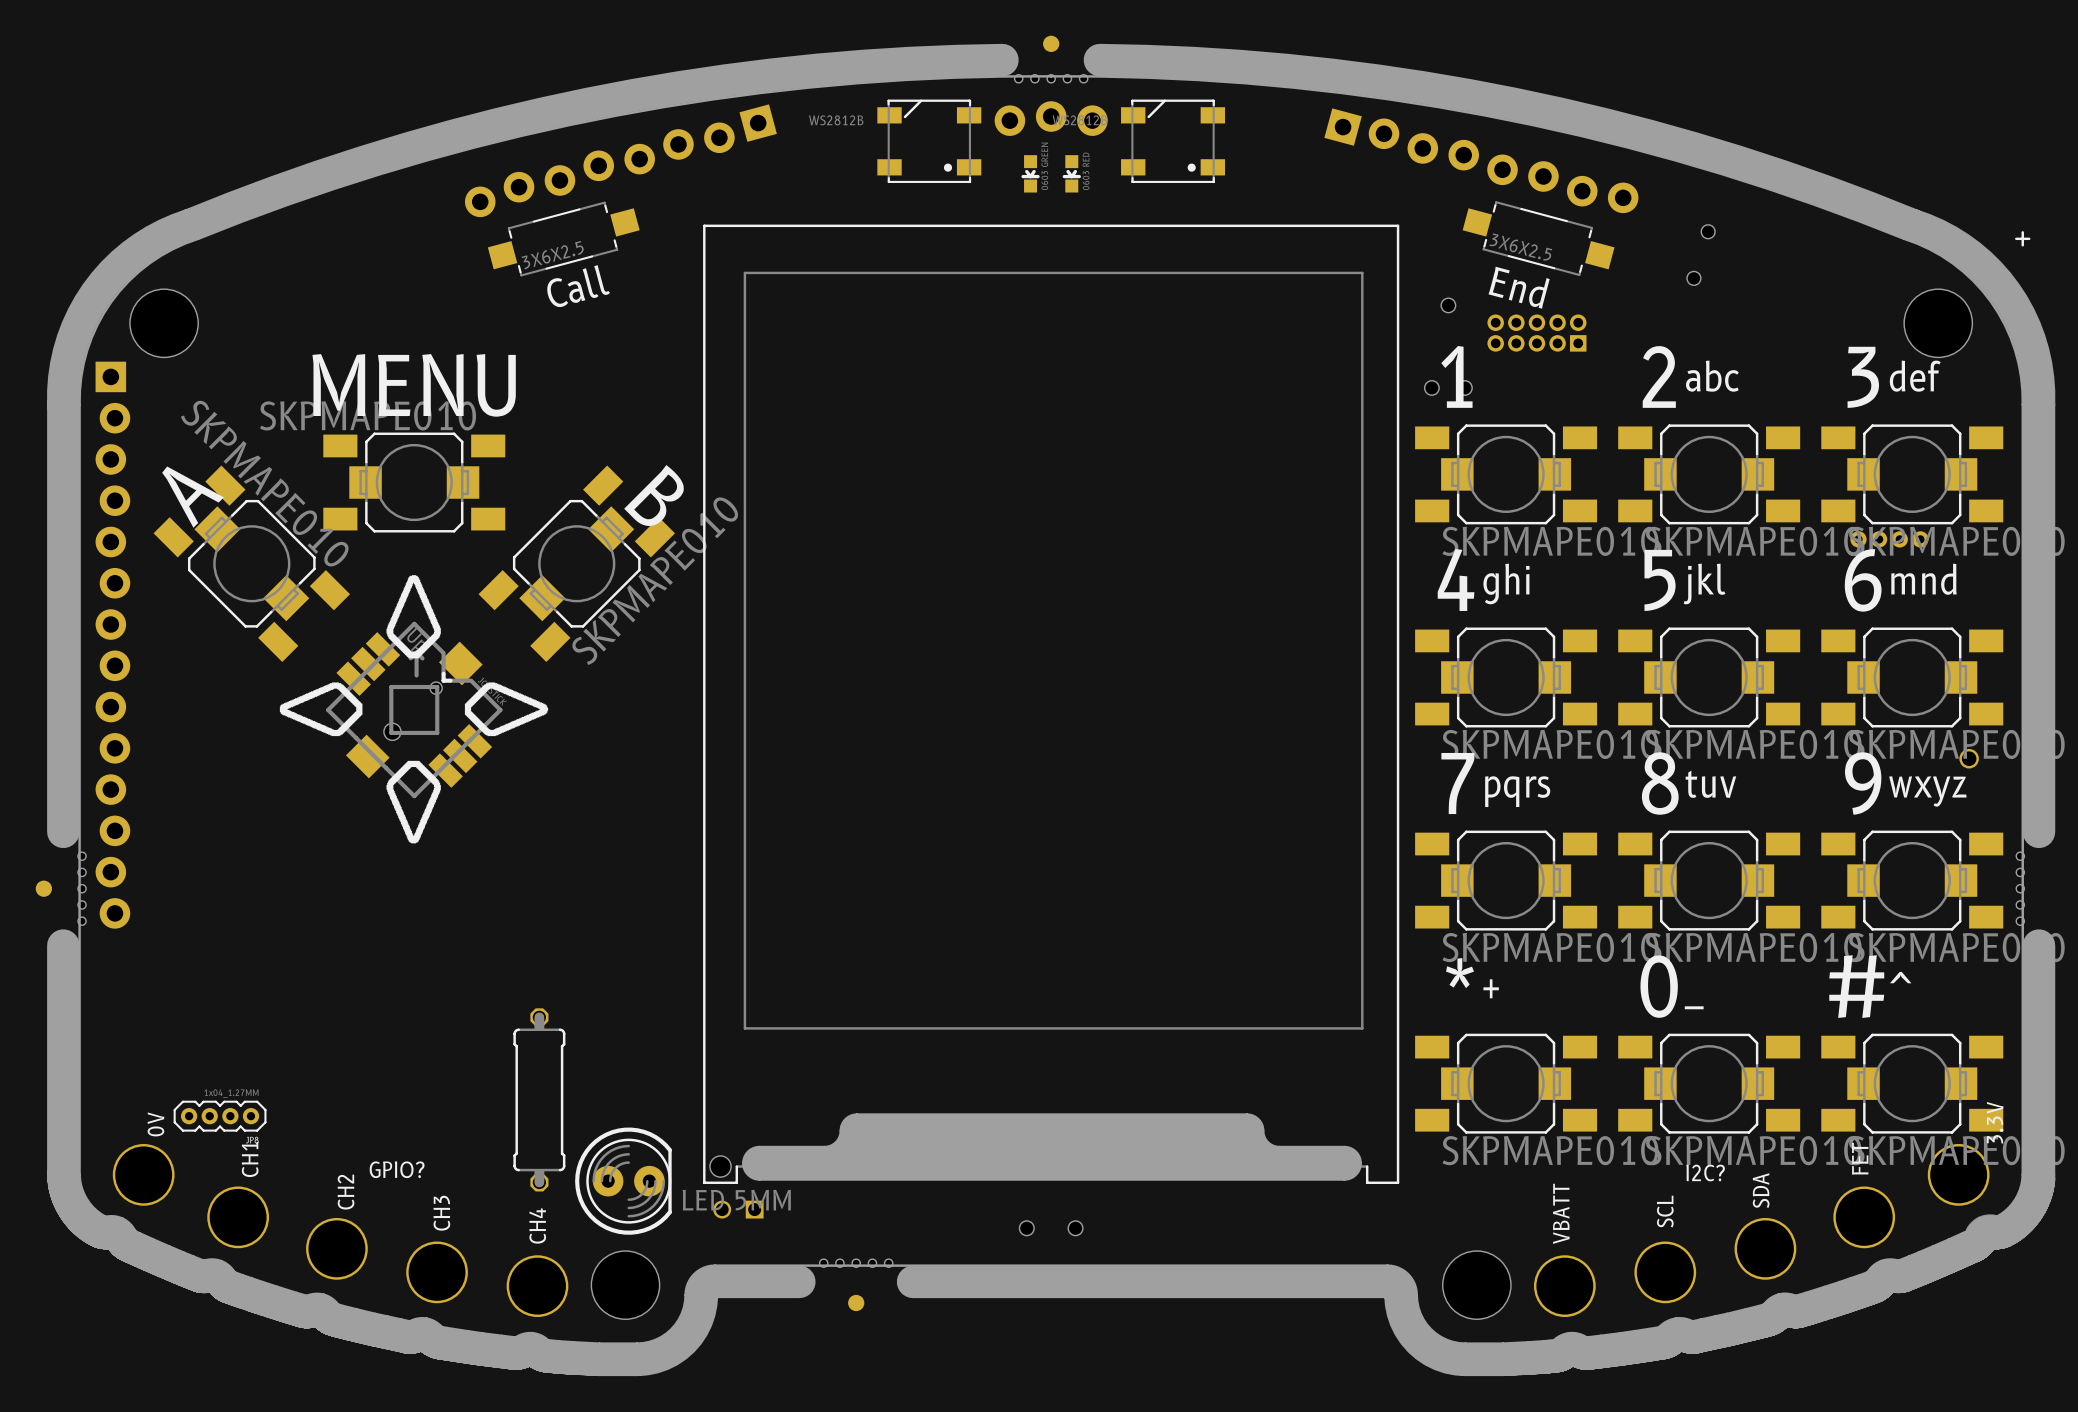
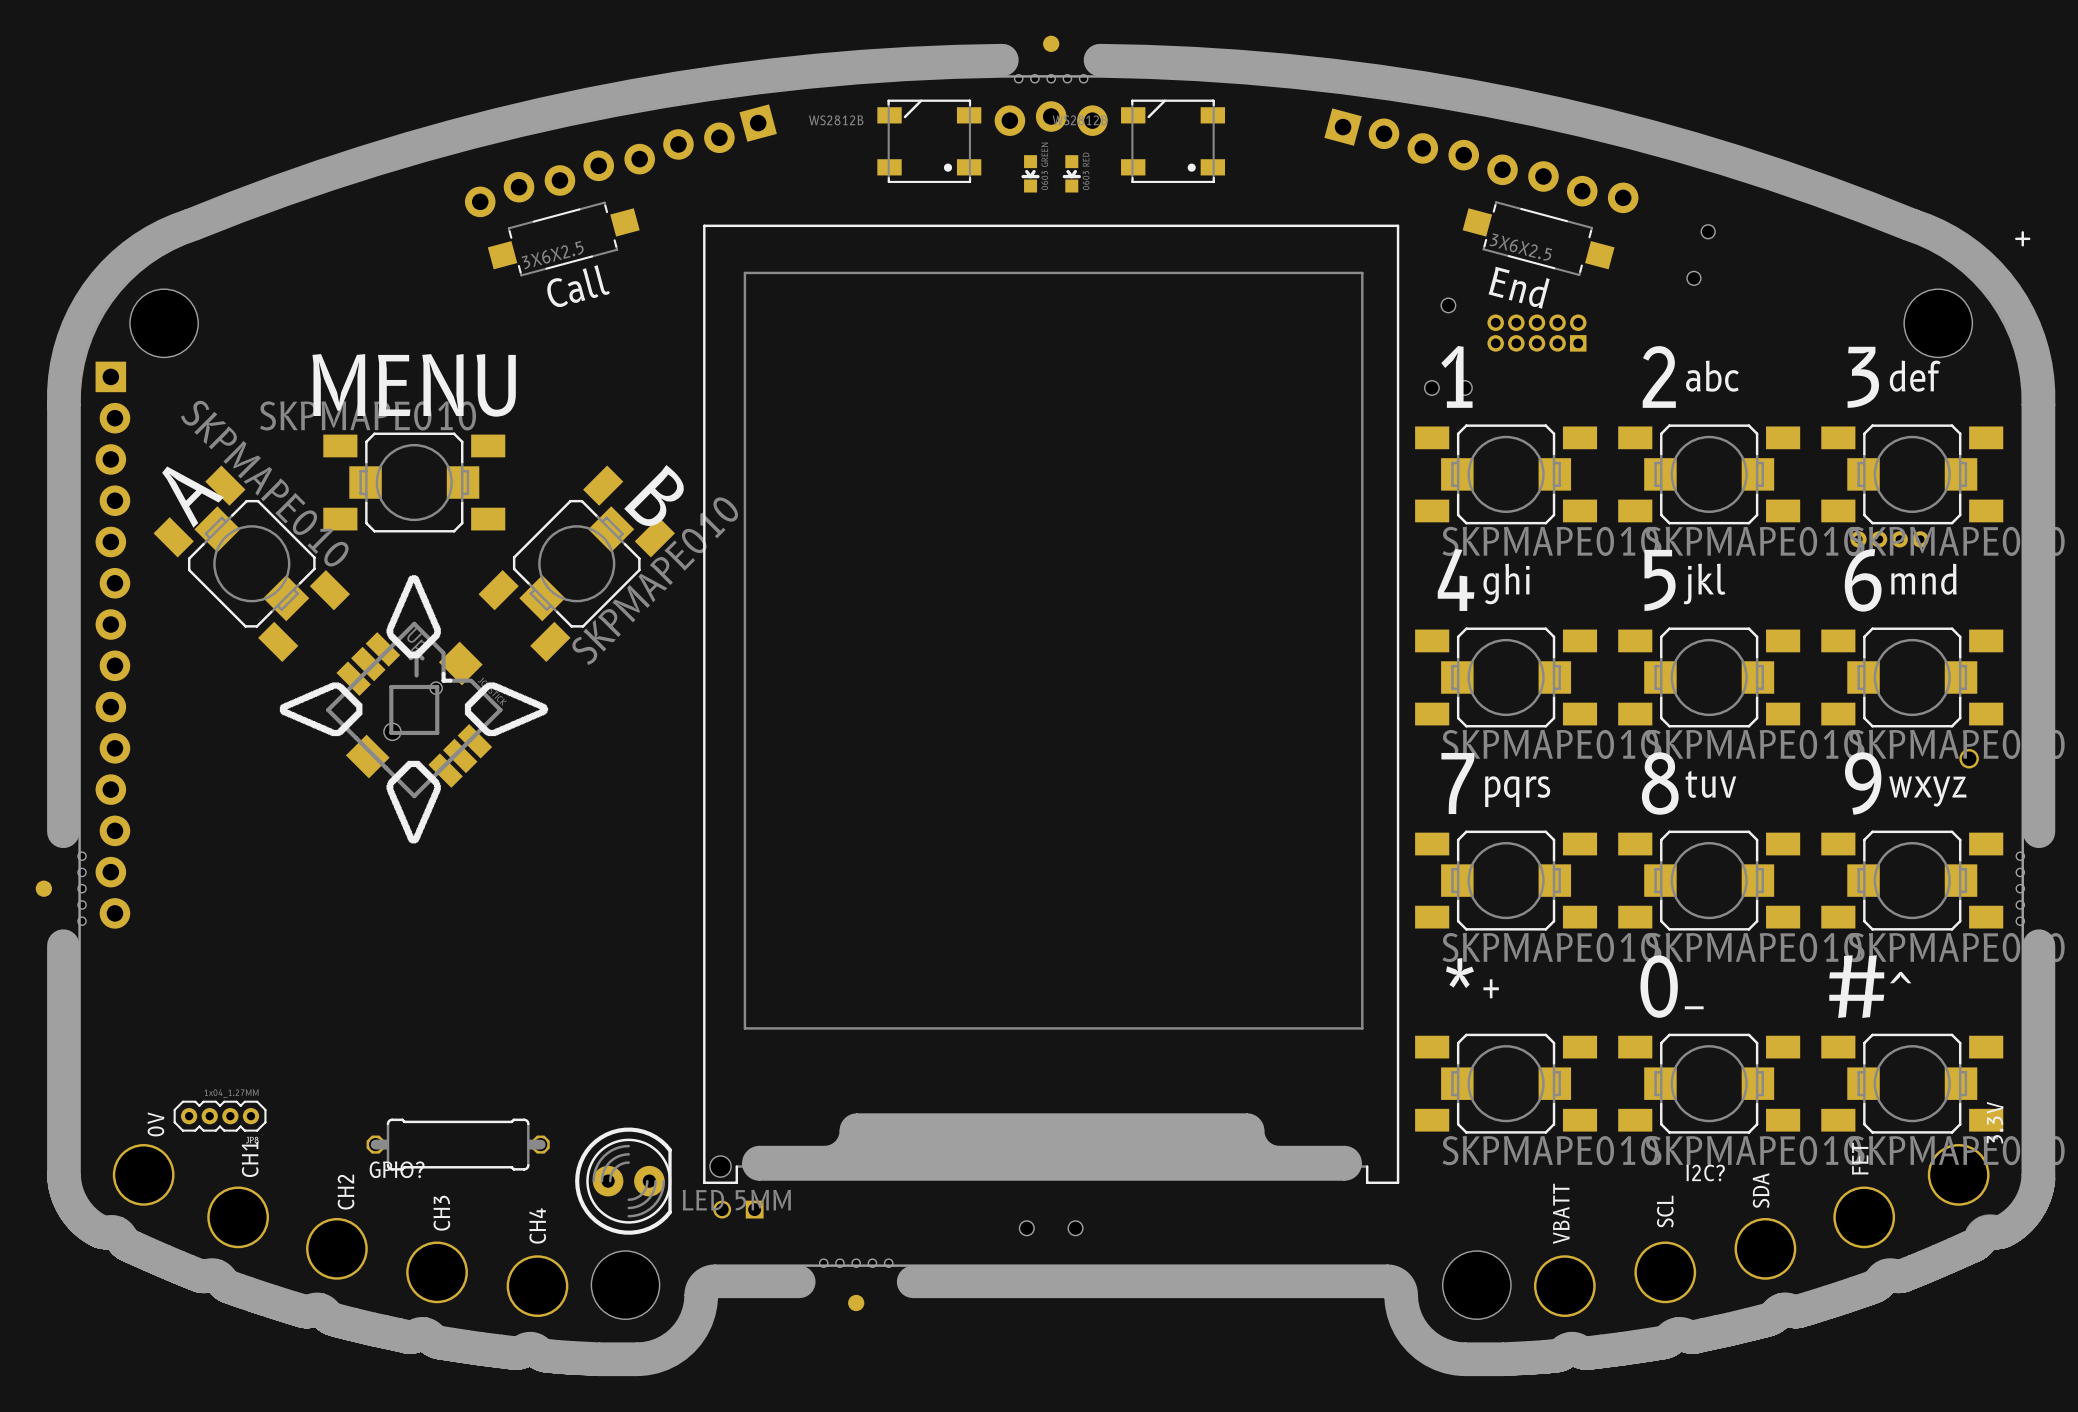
part rotation: 0° (539, 1099) -> 90° clockwise (458, 1144)

